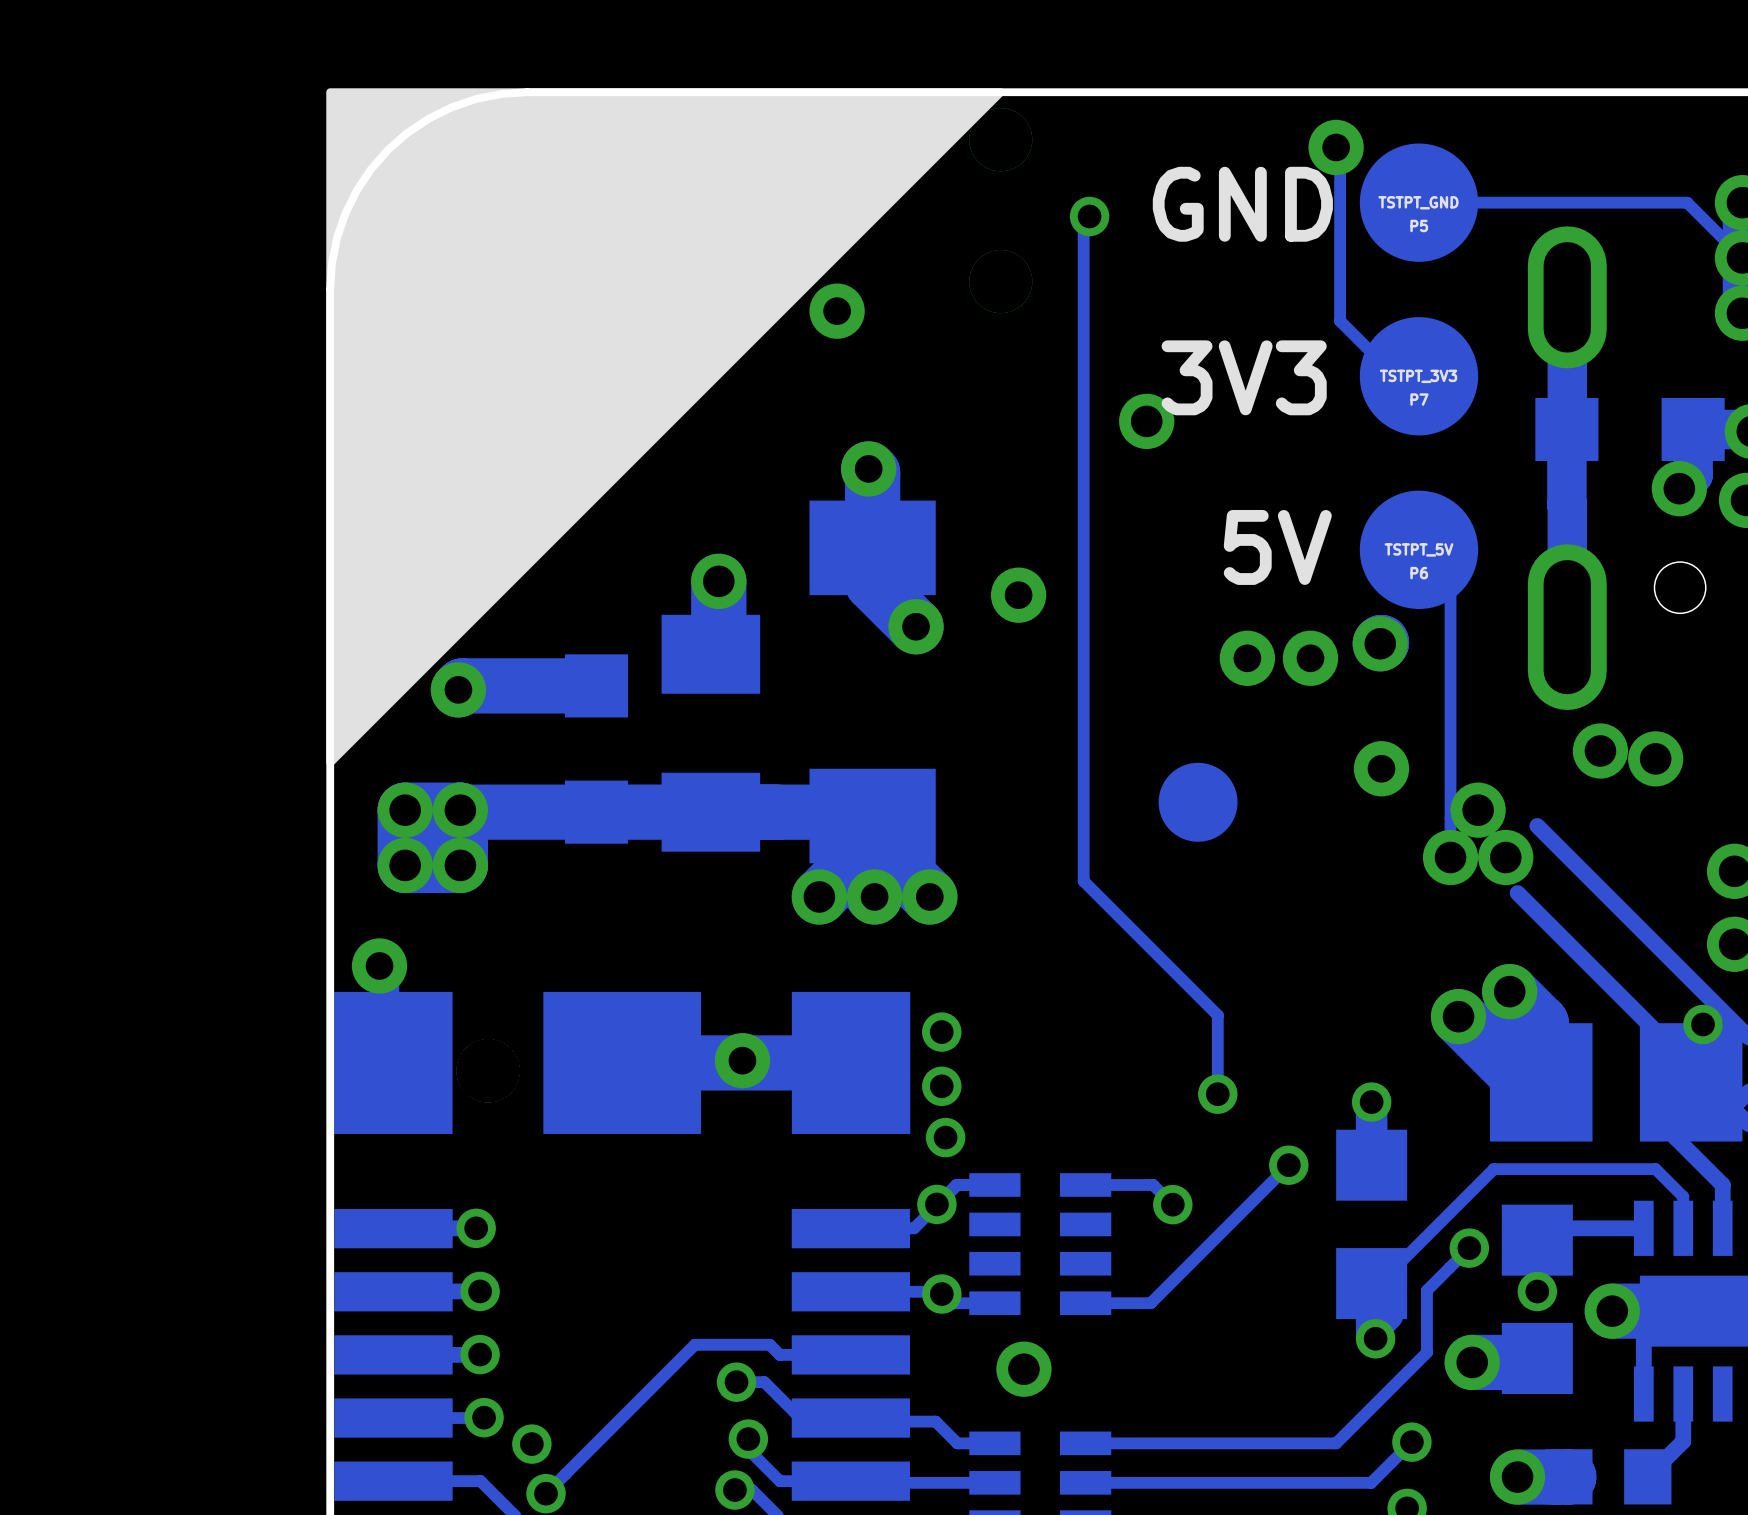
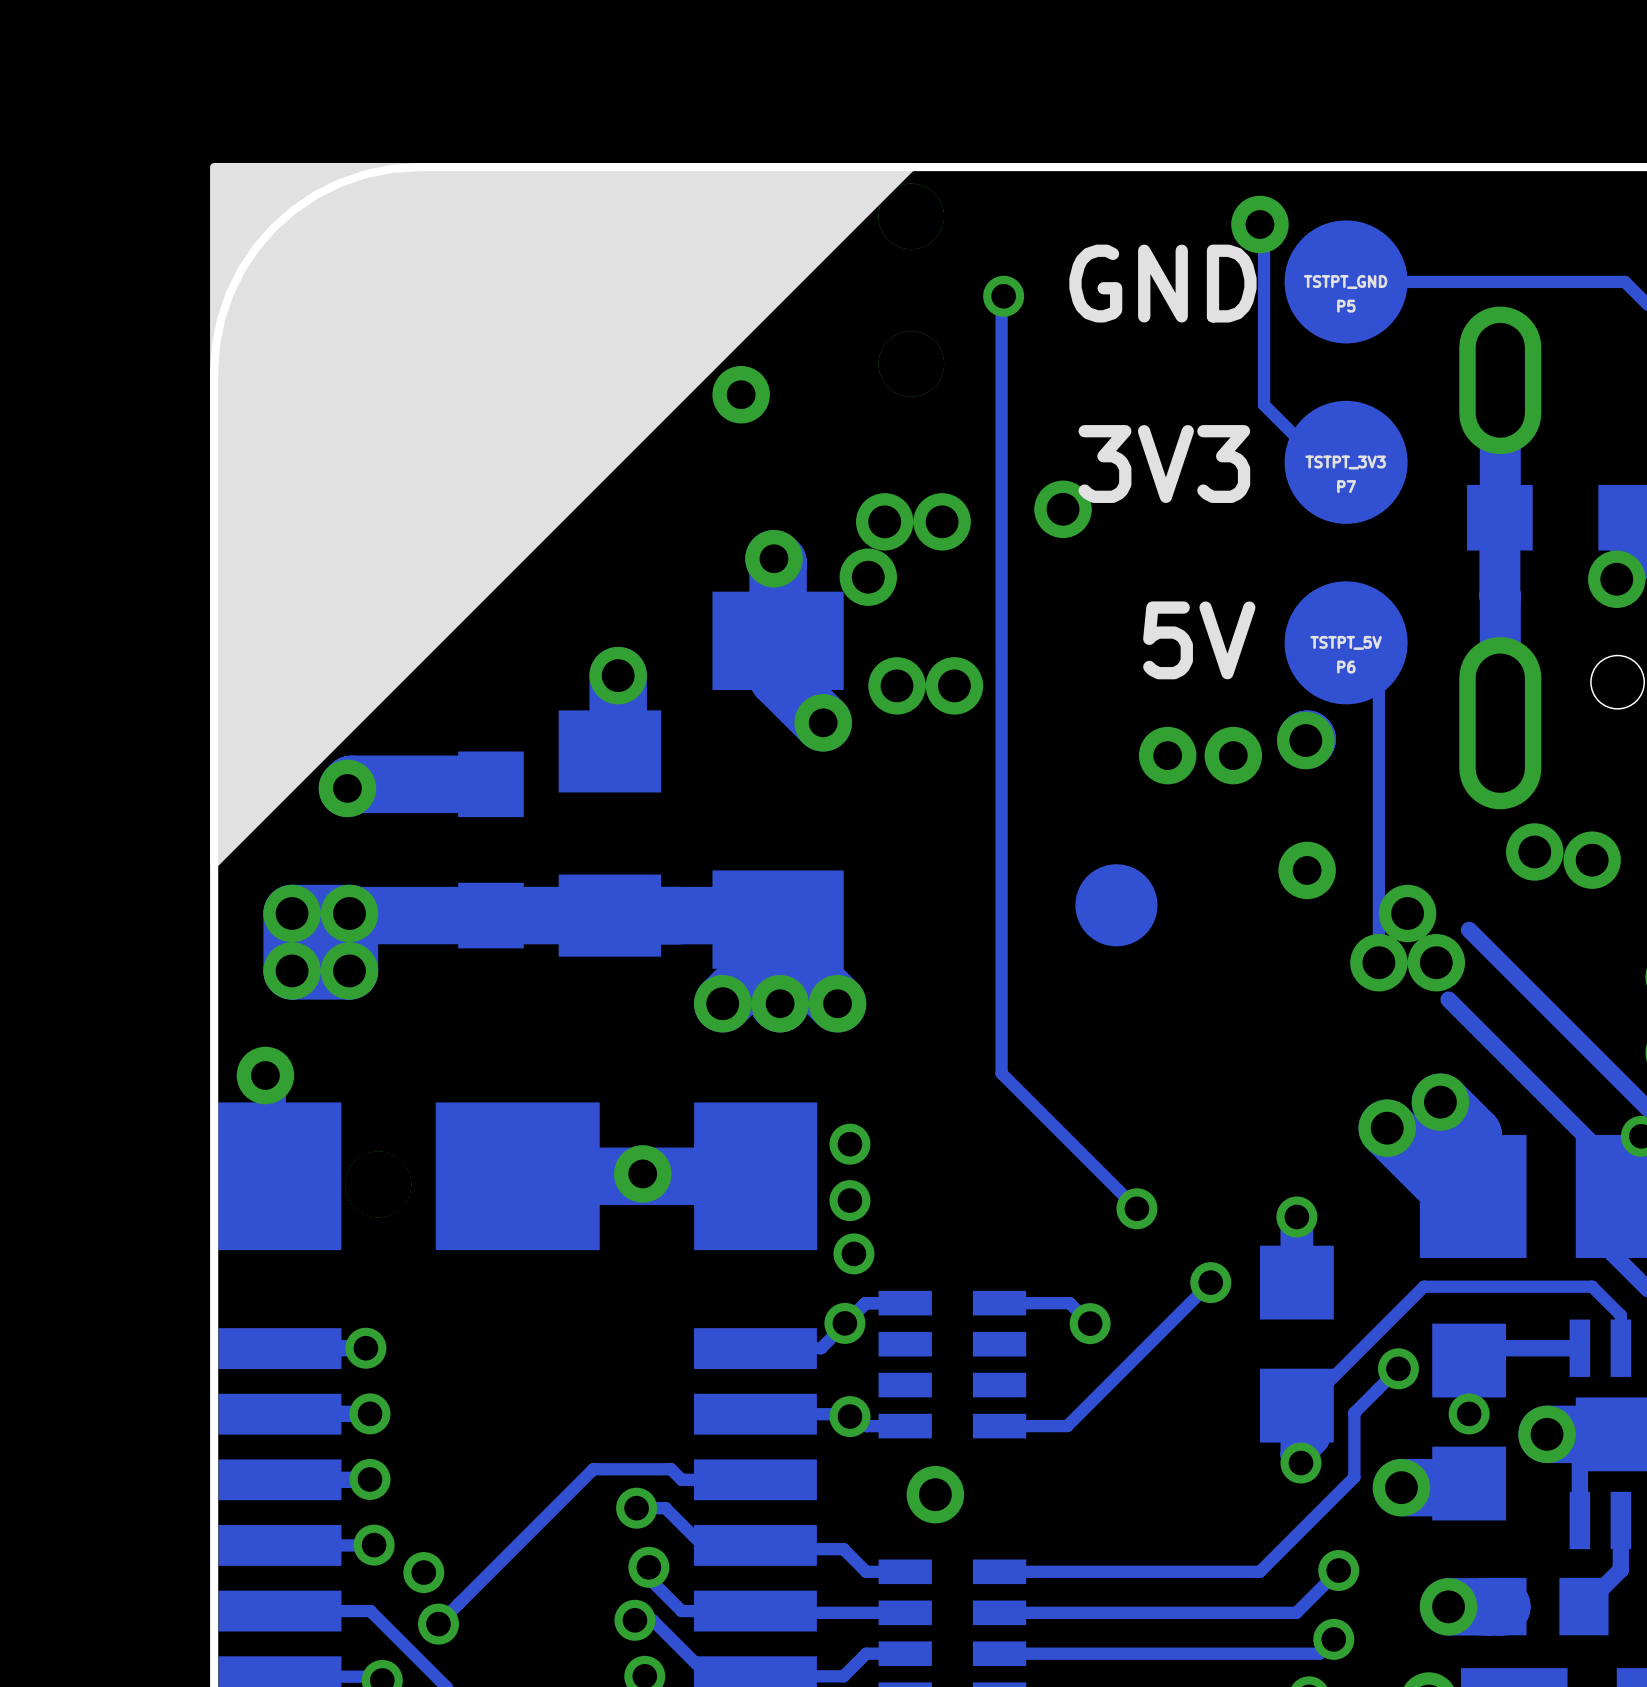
track: (1087, 214) (1083, 218) (1083, 881) (1217, 1015) (1217, 1094) -> (1001, 294) (1001, 1073) (1136, 1208)
via: none -> (884, 521)
via: none -> (942, 521)
via: none -> (868, 577)
via: none -> (897, 685)
via: none -> (954, 685)
via: (1018, 595) -> none

